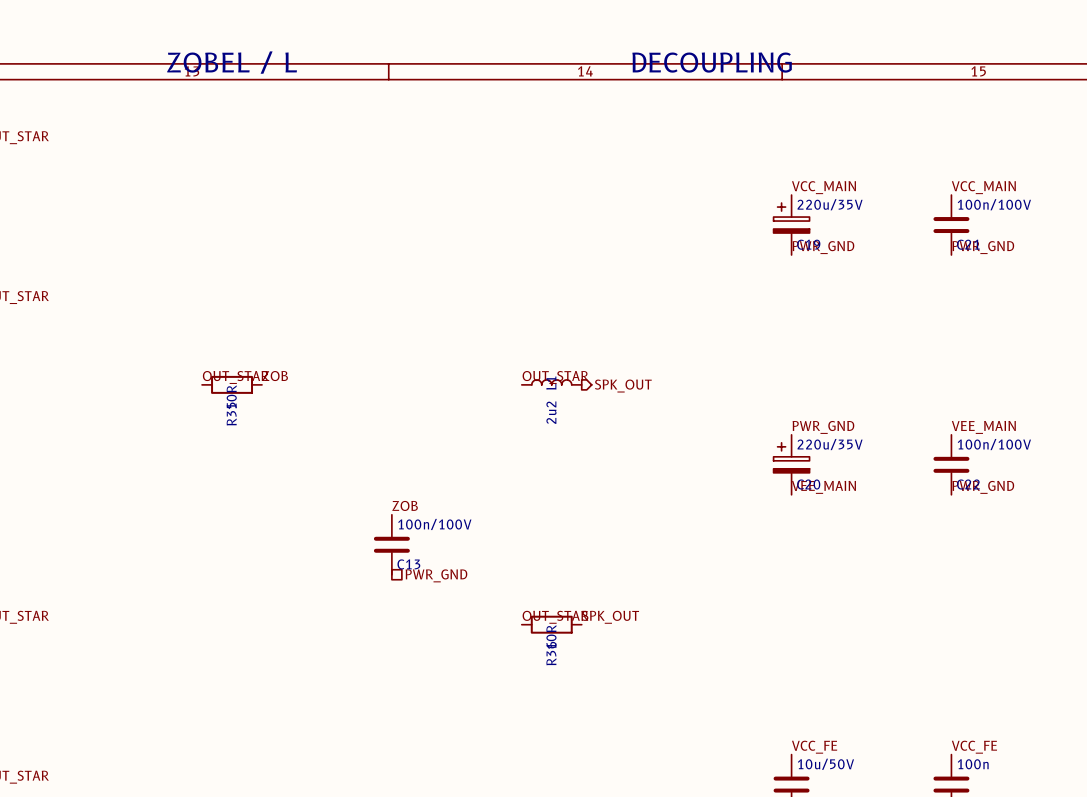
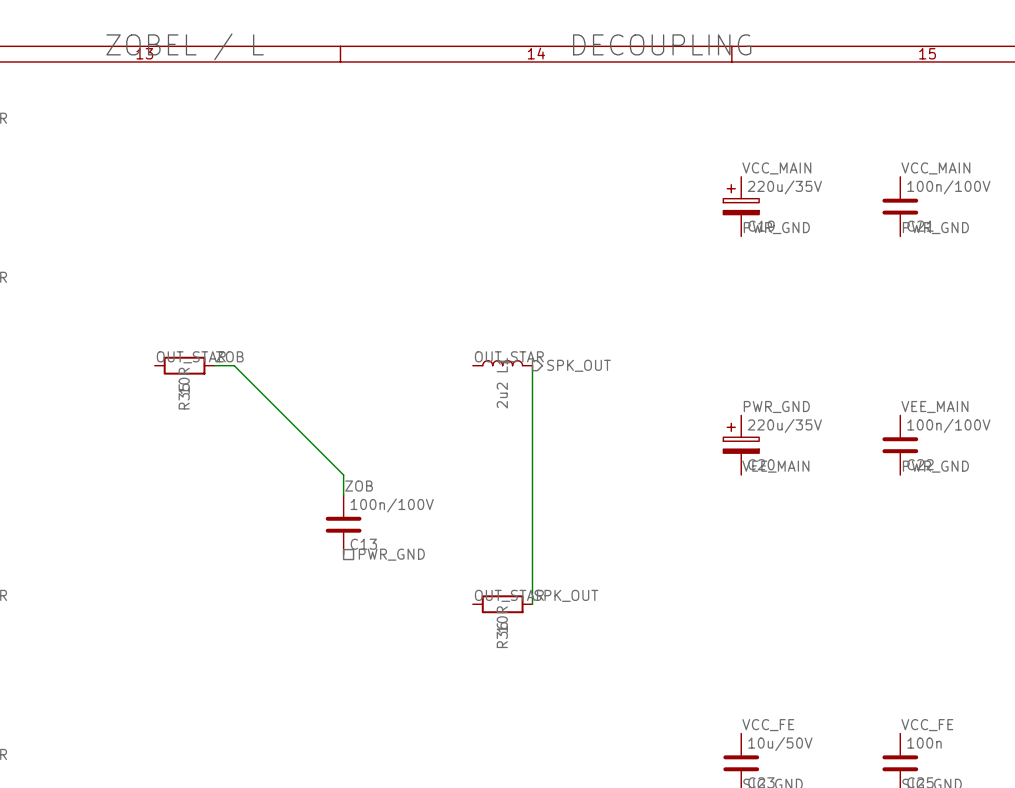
wire: none -> (214, 365) (234, 365) (343, 475) (343, 494)
wire: none -> (532, 365) (532, 604)

